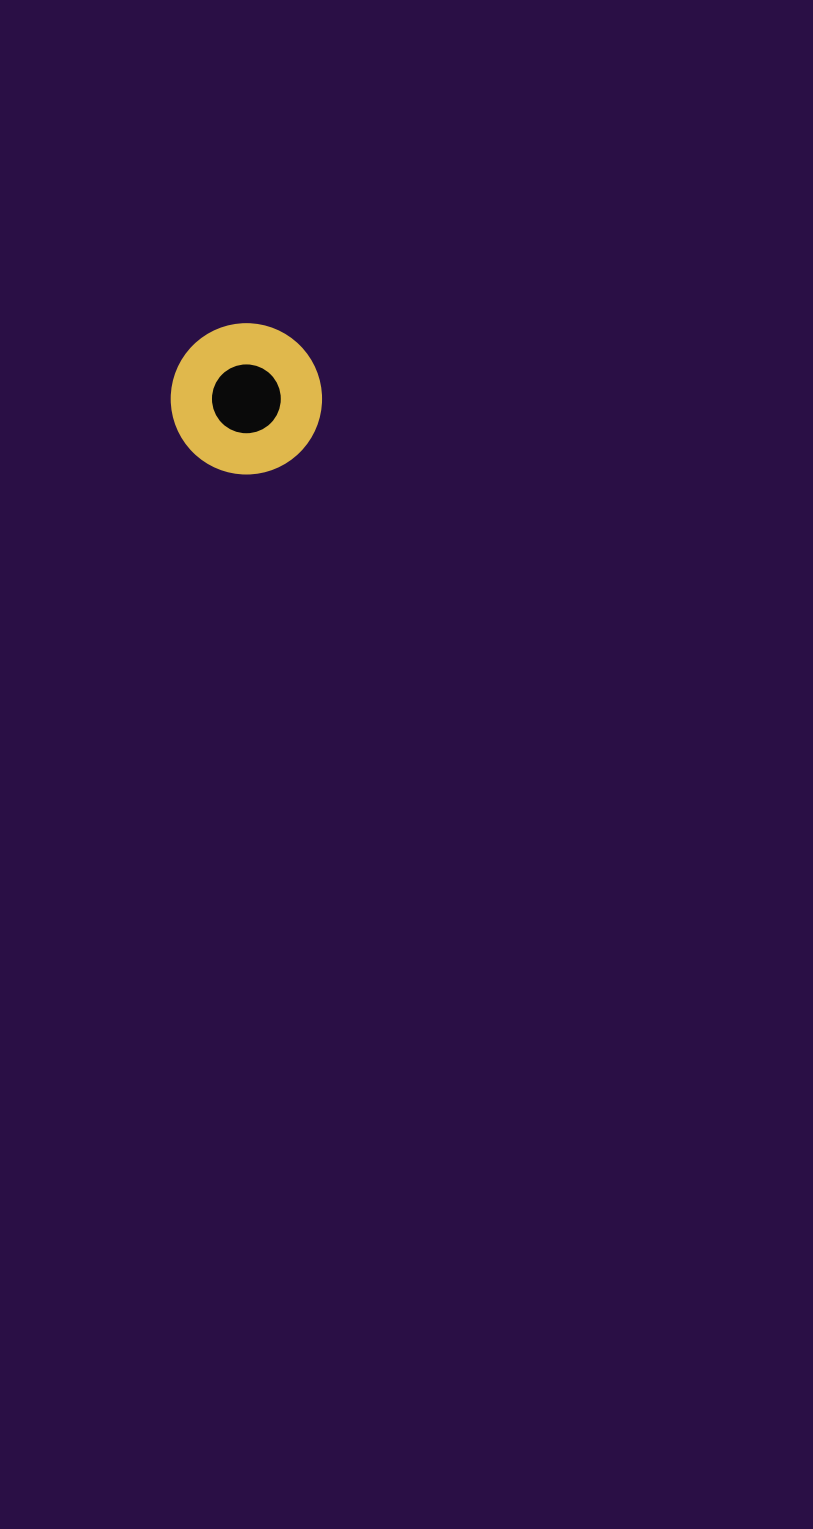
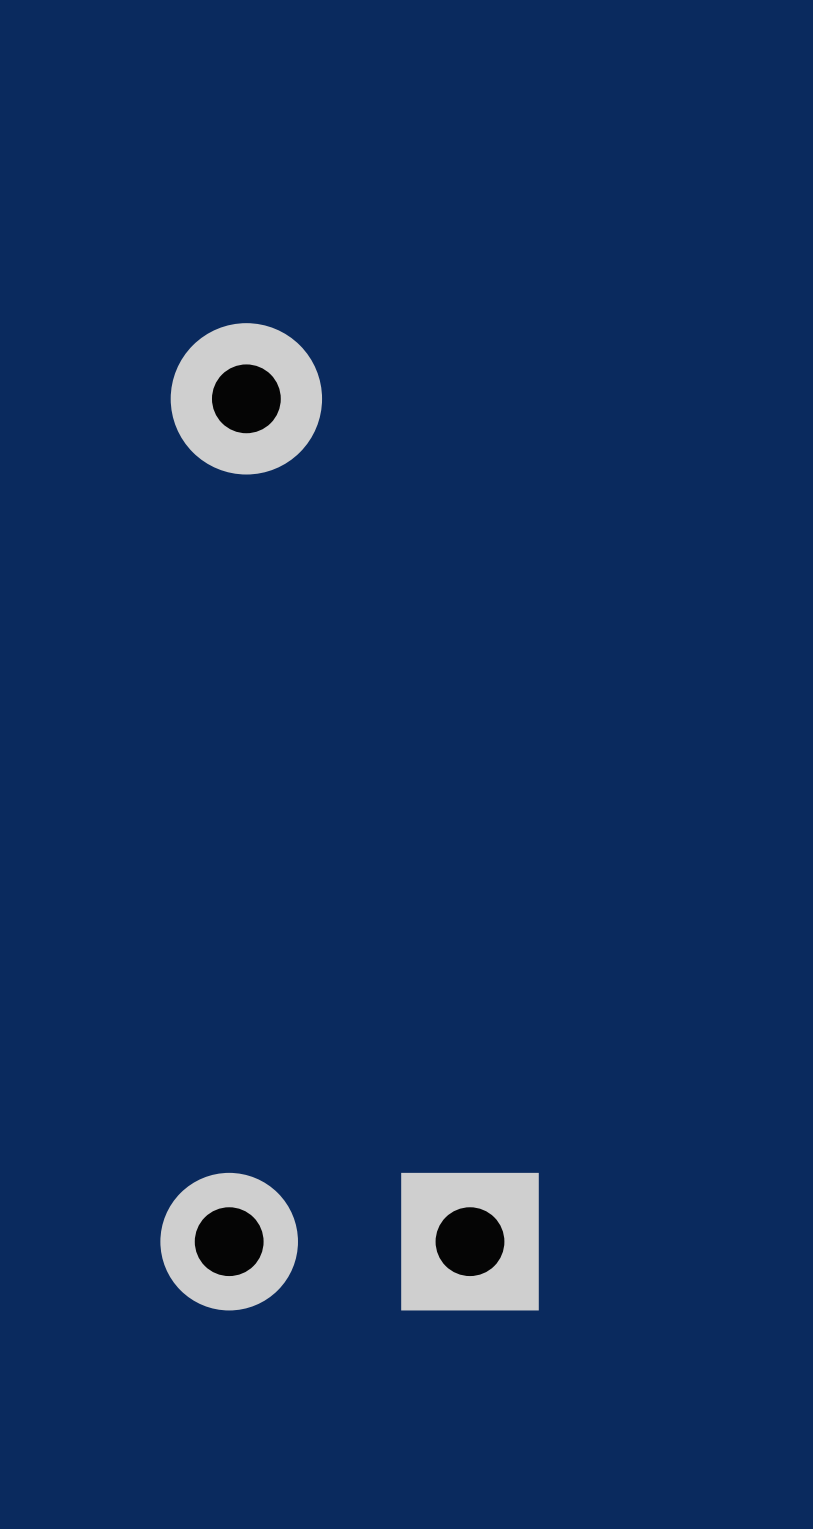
part: none -> (349, 1241)

